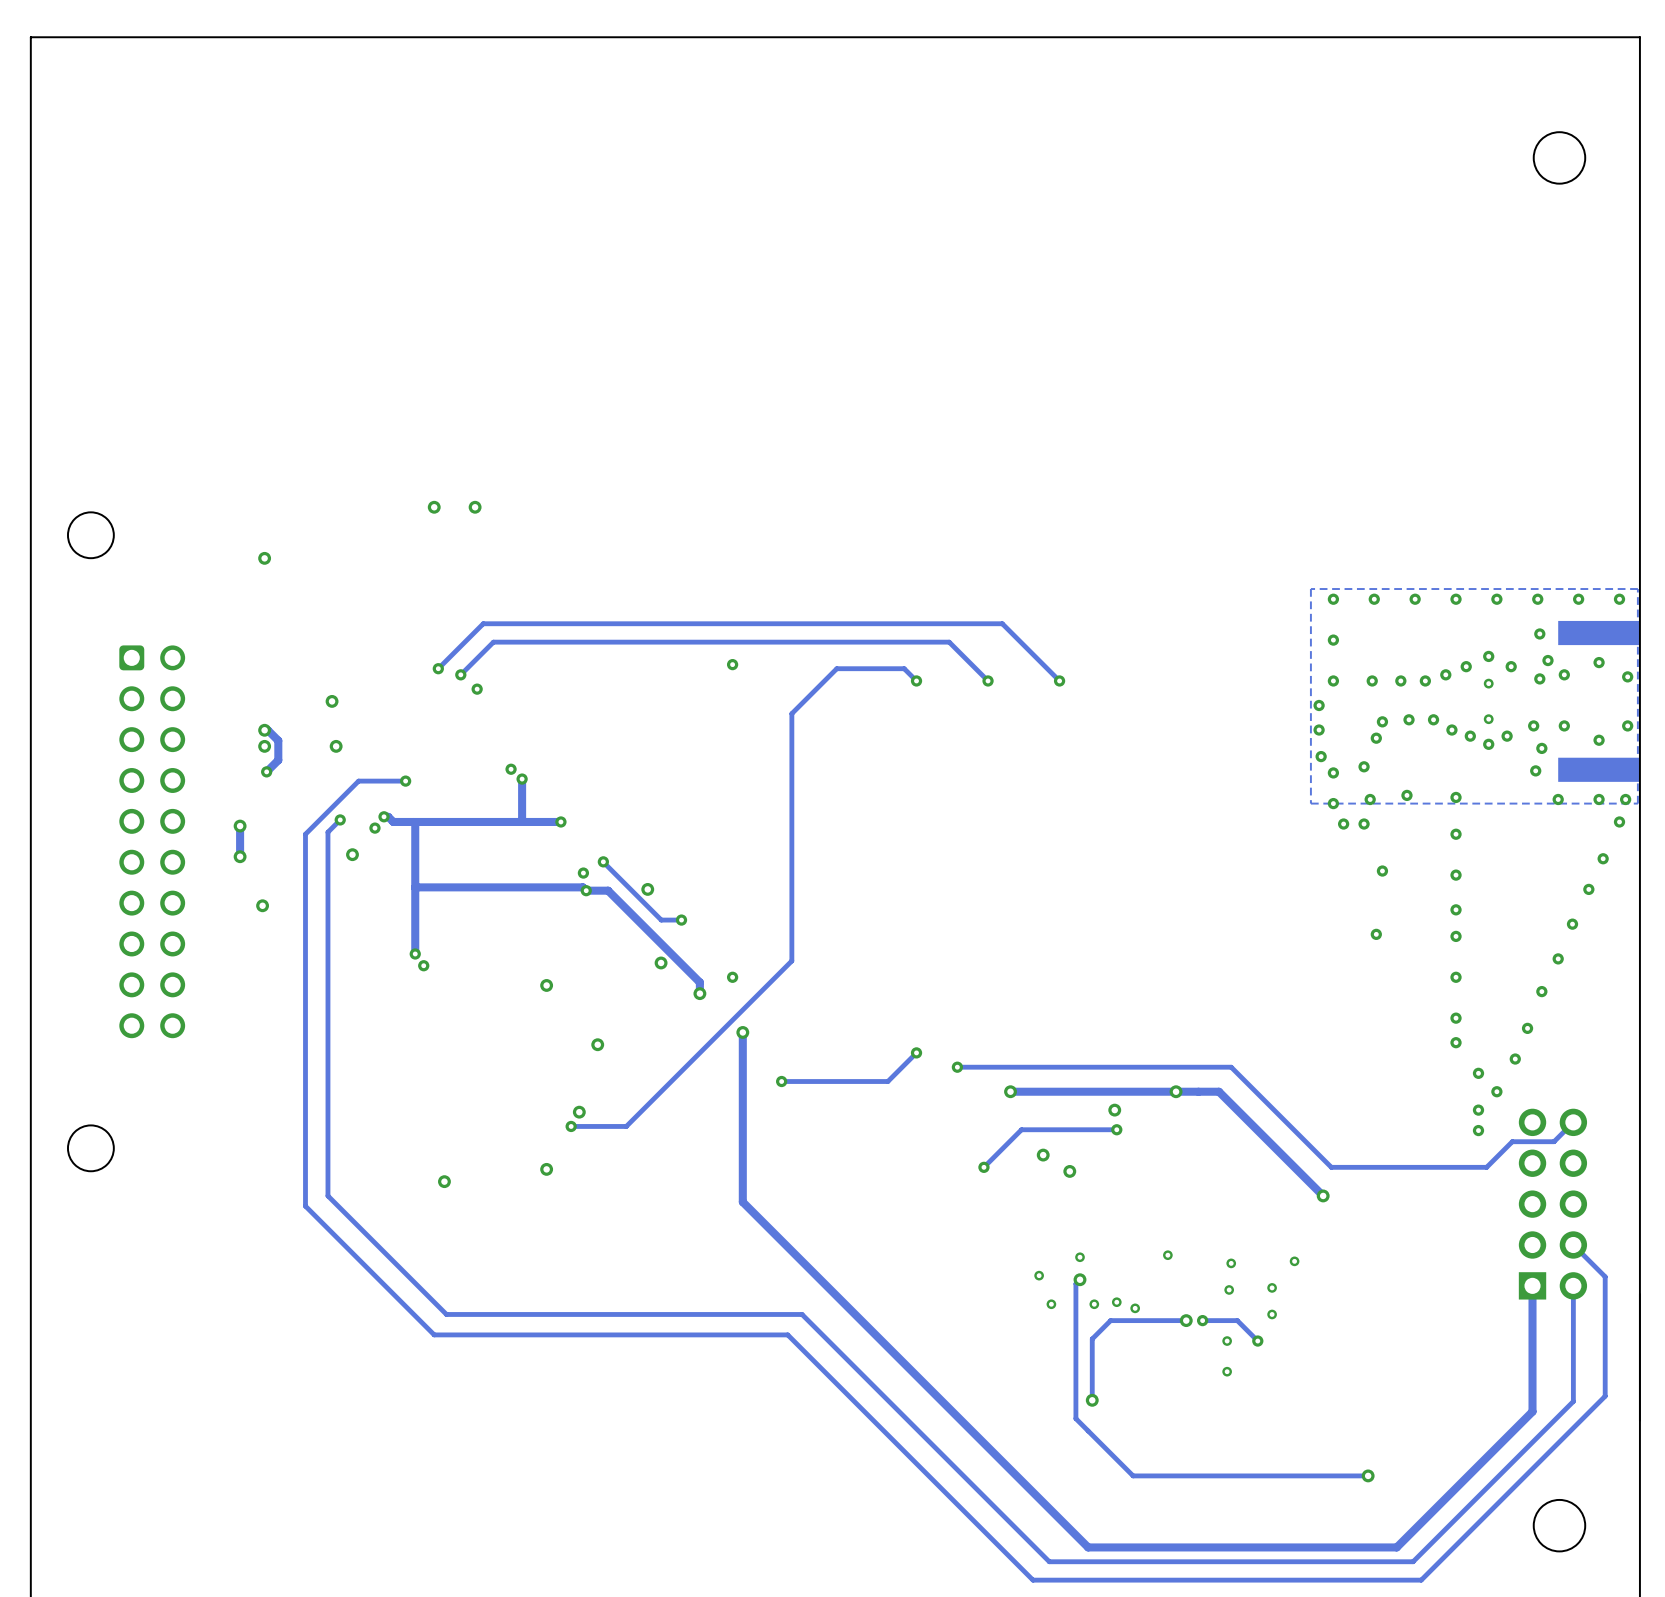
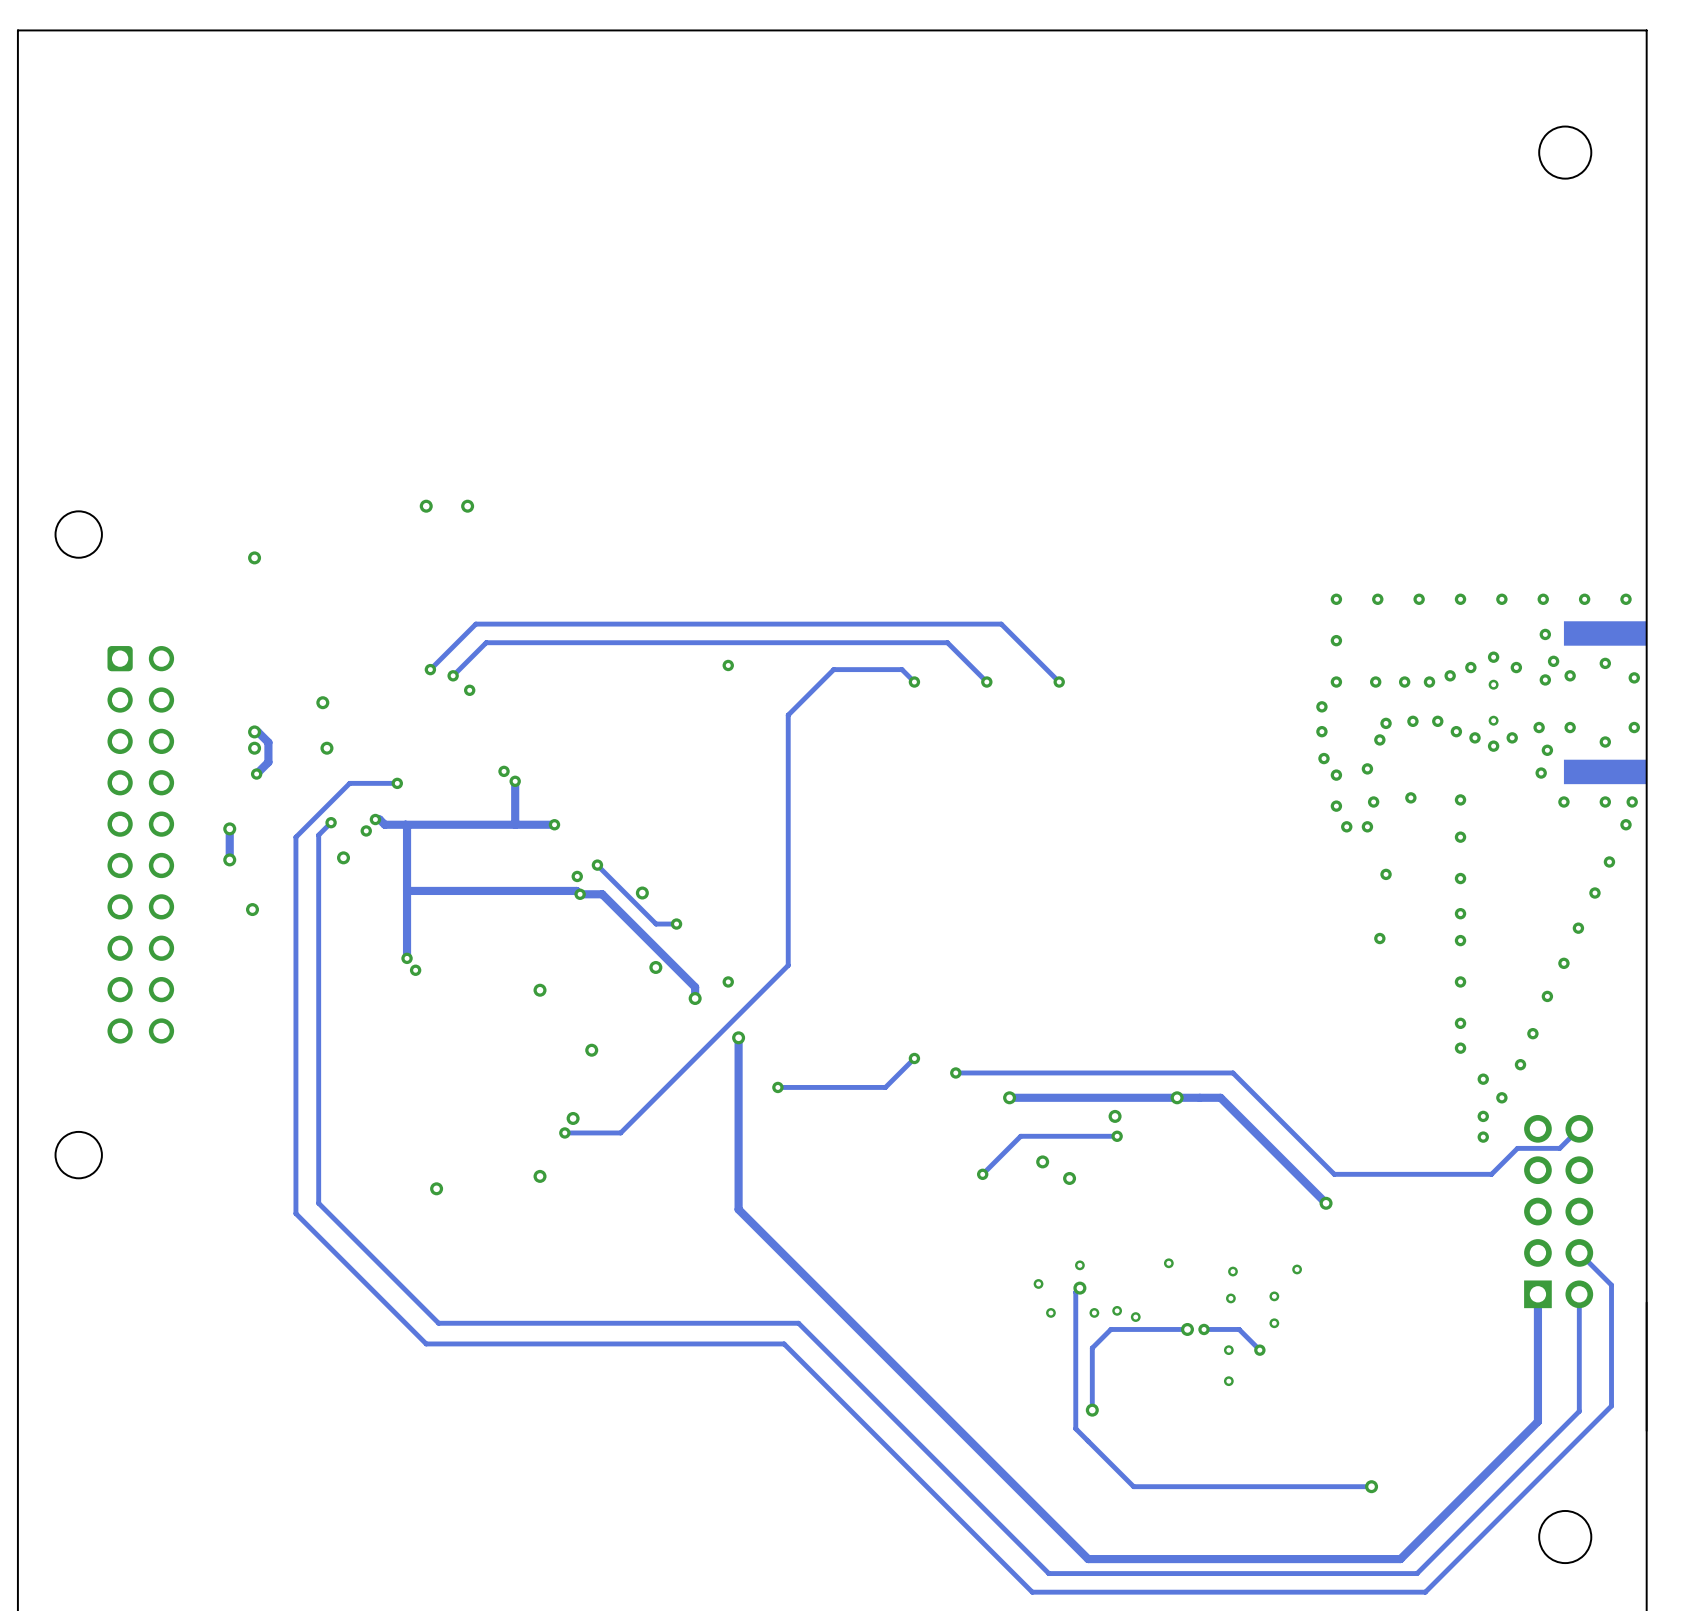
zone outline: (1637, 589) (1310, 589) (1310, 803) (1637, 803) (1637, 589) -> none

